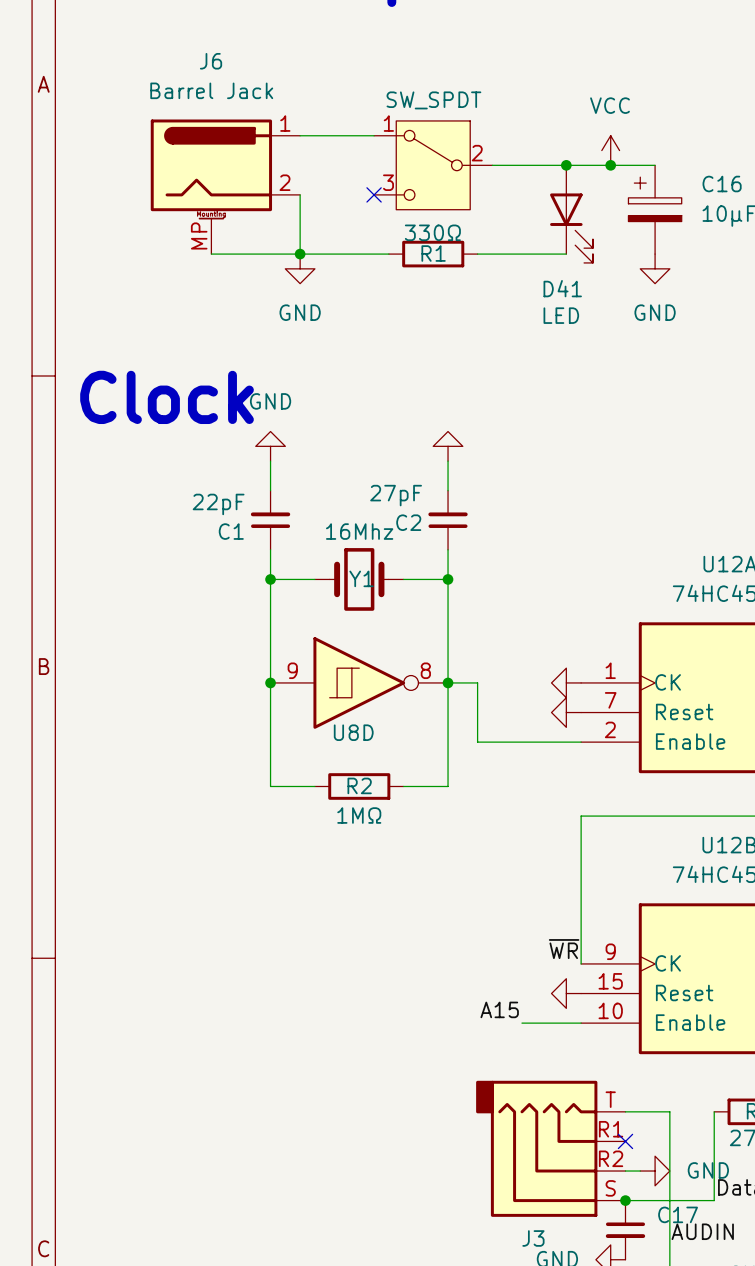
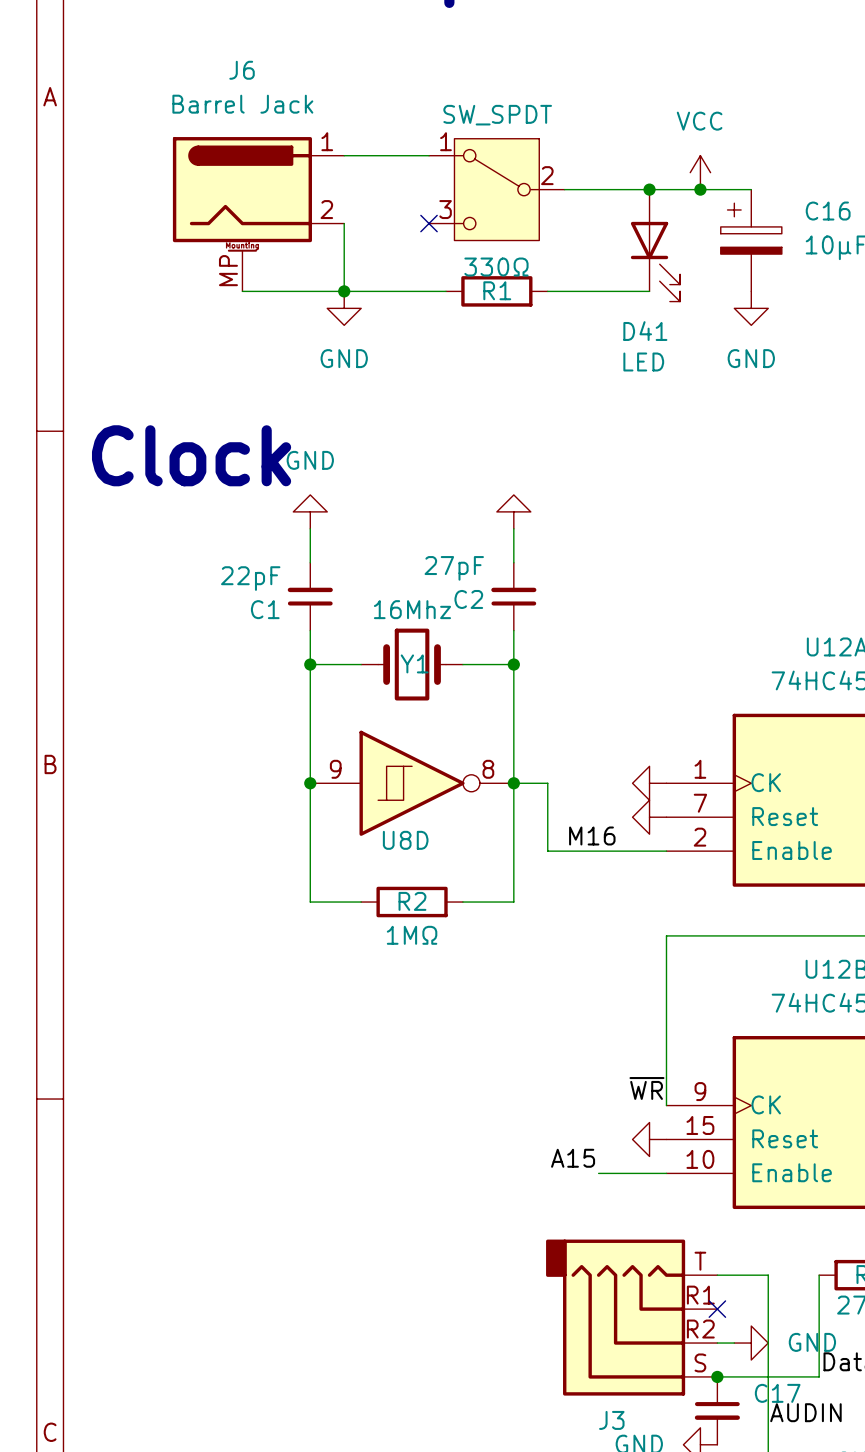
label: none -> M16 (592, 835)

